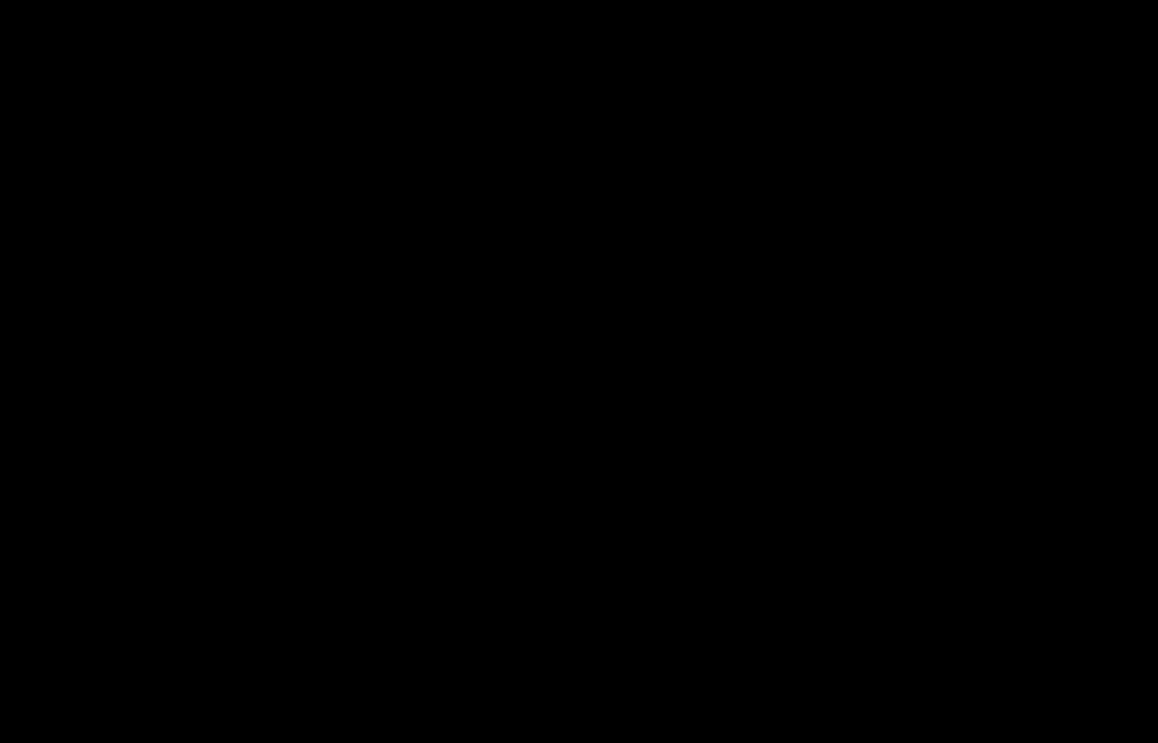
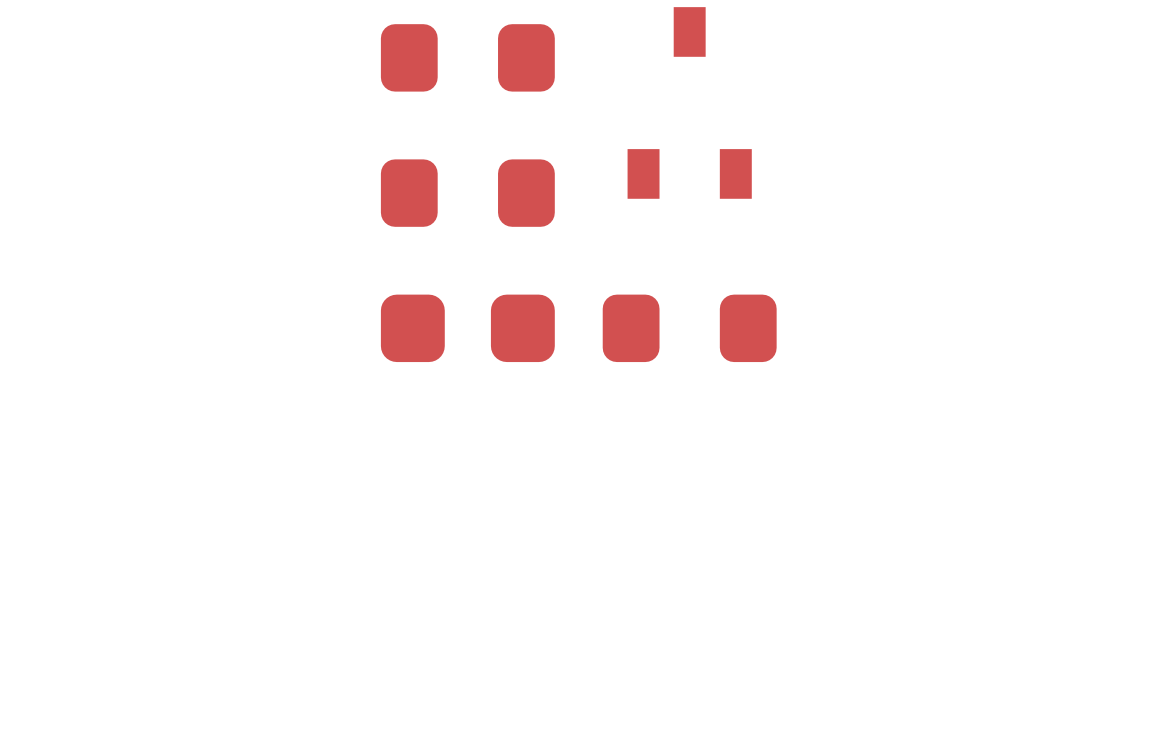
part: none -> (467, 57)
part: none -> (689, 102)
part: none -> (467, 193)
part: none -> (467, 328)
part: none -> (689, 328)

